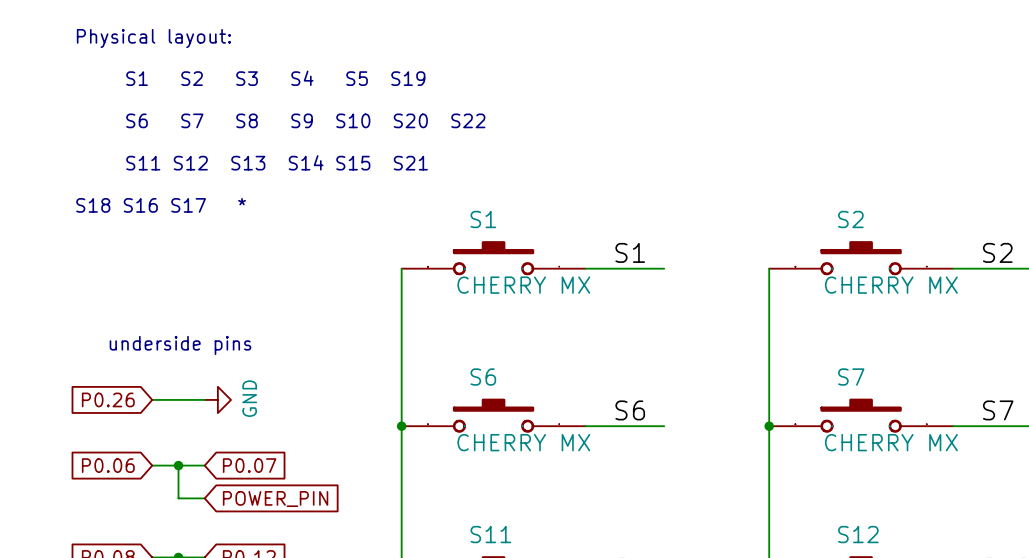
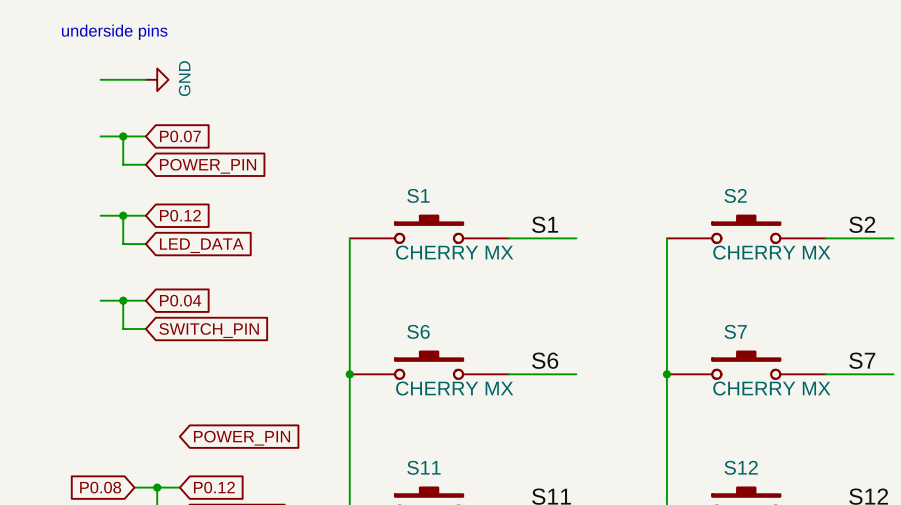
text: none -> underside pins (114, 32)
text: Physical layout: (153, 38) -> none
text: S1 S2 S3 S4 S5 S19 (275, 78) -> none
wire: none -> (100, 79) (145, 79)
power symbol: none -> GND (157, 79)
text: S6 S7 S8 S9 S10 S20 S22 (305, 120) -> none
wire: none -> (100, 136) (145, 136)
wire: none -> (123, 136) (123, 164) (145, 164)
junction: none -> (123, 136)
global label: none -> P0.07 (180, 136)
text: S11 S12 S13 S14 S15 S21 (277, 162) -> none
global label: none -> POWER_PIN (208, 166)
text: S18 S16 S17 * (161, 205) -> none
wire: none -> (123, 215) (123, 244) (145, 244)
junction: none -> (123, 215)
global label: none -> P0.12 (180, 215)
global label: none -> LED_DATA (201, 245)
junction: none -> (123, 300)
global label: none -> P0.04 (180, 300)
text: underside pins (180, 345) -> none
global label: none -> SWITCH_PIN (209, 330)
global label: P0.26 (108, 399) -> none
wire: (152, 399) (204, 399) -> (100, 215) (145, 215)
power symbol: GND (217, 399) -> none
global label: P0.06 (108, 465) -> none
wire: (152, 465) (204, 465) -> (100, 300) (145, 300)
wire: (178, 465) (178, 498) (204, 498) -> (123, 300) (123, 329) (145, 329)
junction: (178, 465) -> none
global label: P0.07 (249, 465) -> none

